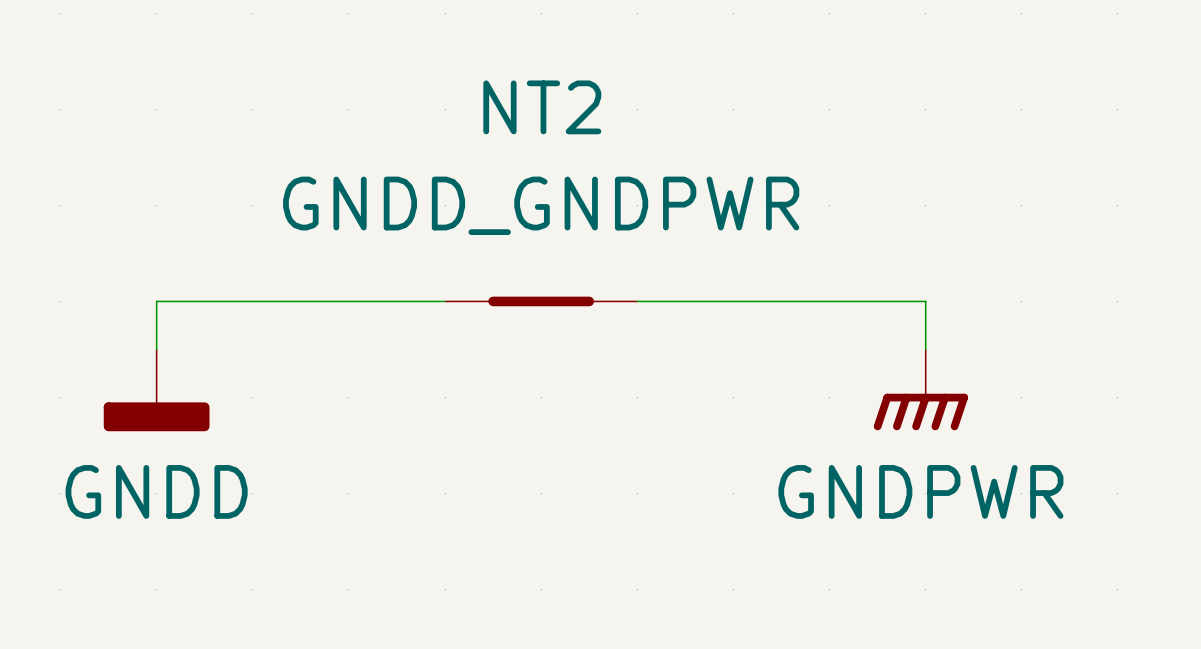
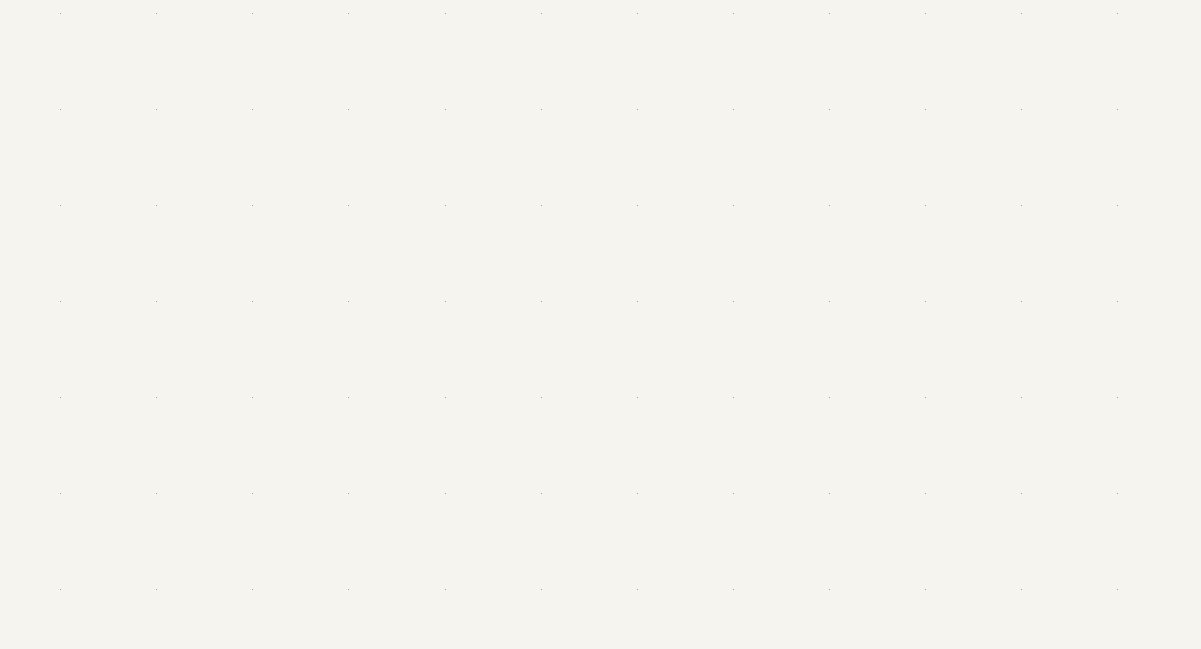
wire: (445, 301) (156, 301) (156, 349) -> none
NT2: GNDD_GNDPWR (541, 301) -> none
wire: (637, 301) (925, 301) (925, 349) -> none
power symbol: GNDPWR (920, 389) -> none
power symbol: GNDD (156, 390) -> none

